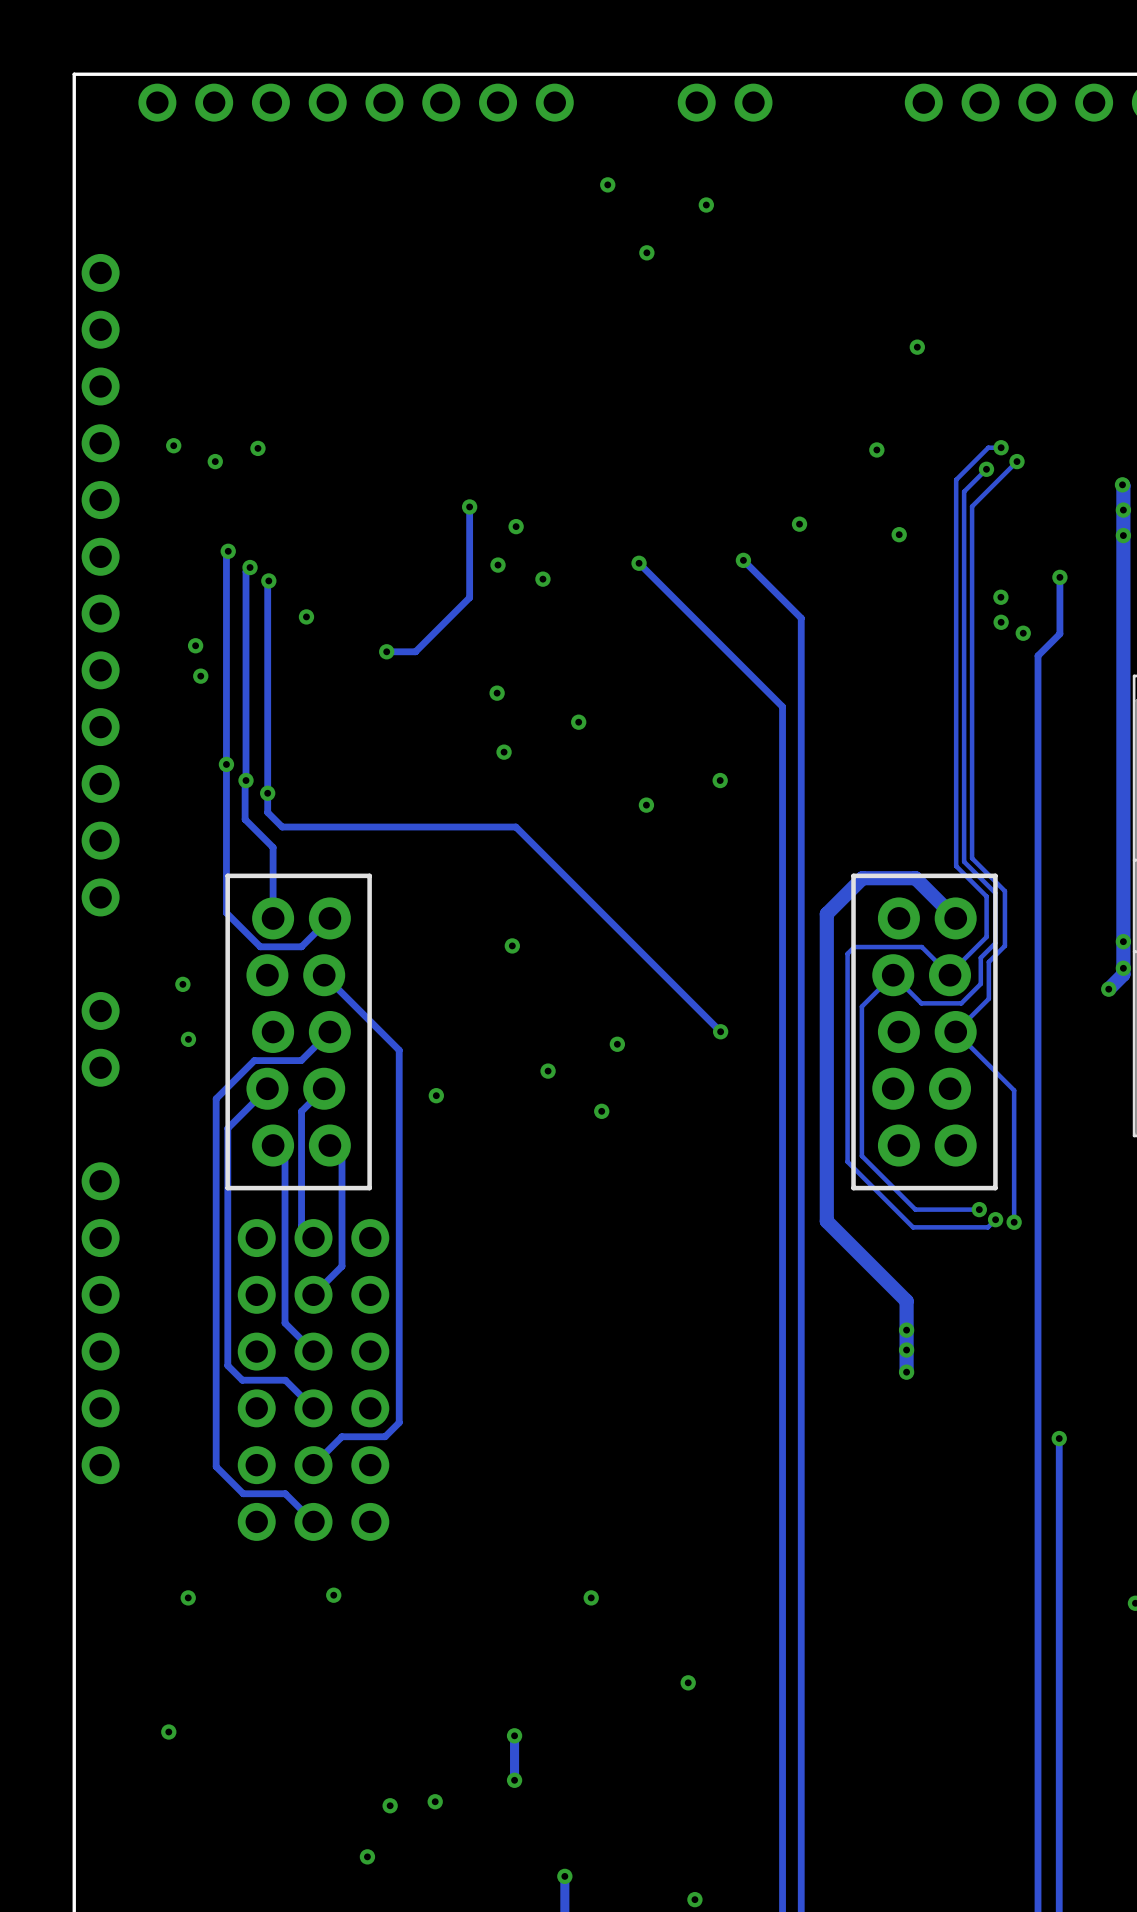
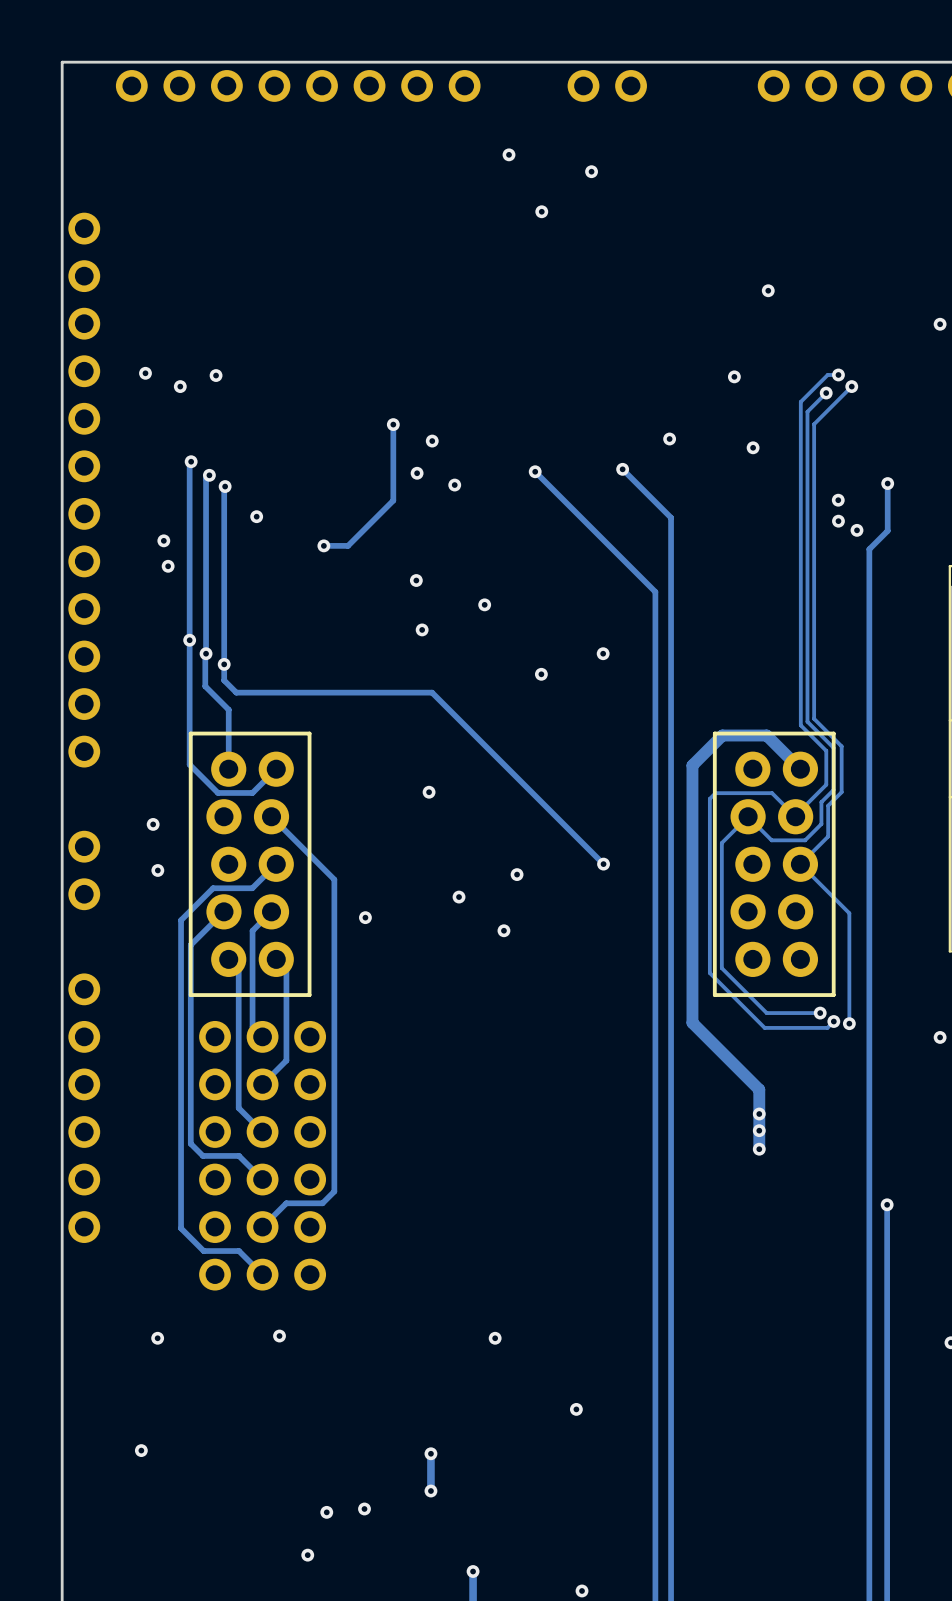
via: none -> (940, 324)
track: (1122, 484) (1123, 974) (1108, 989) -> none
via: (1122, 484) -> none
via: (1123, 510) -> none
via: (1123, 535) -> none
via: (1123, 941) -> none
via: (1123, 968) -> none
via: (1108, 989) -> none
via: none -> (940, 1037)

